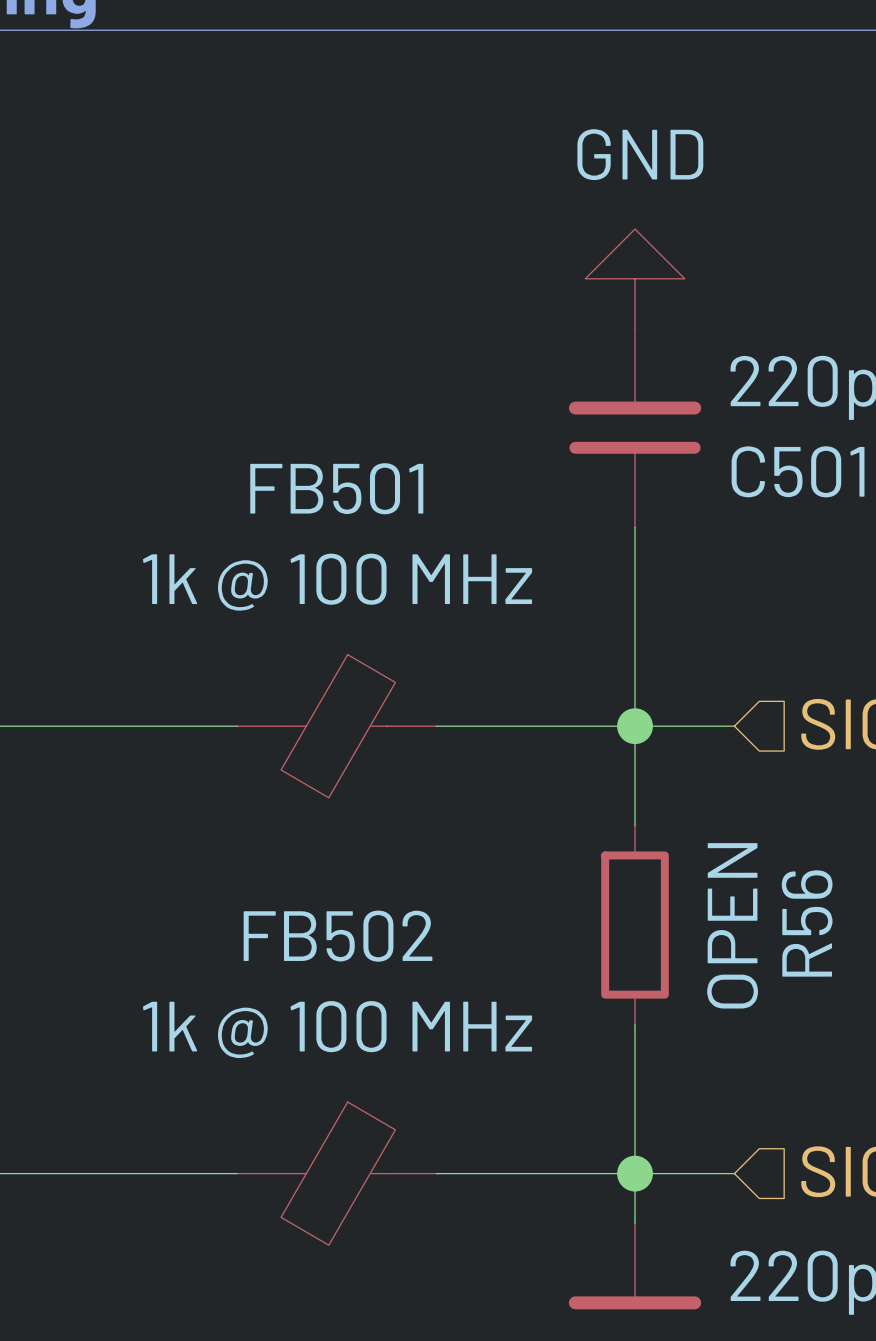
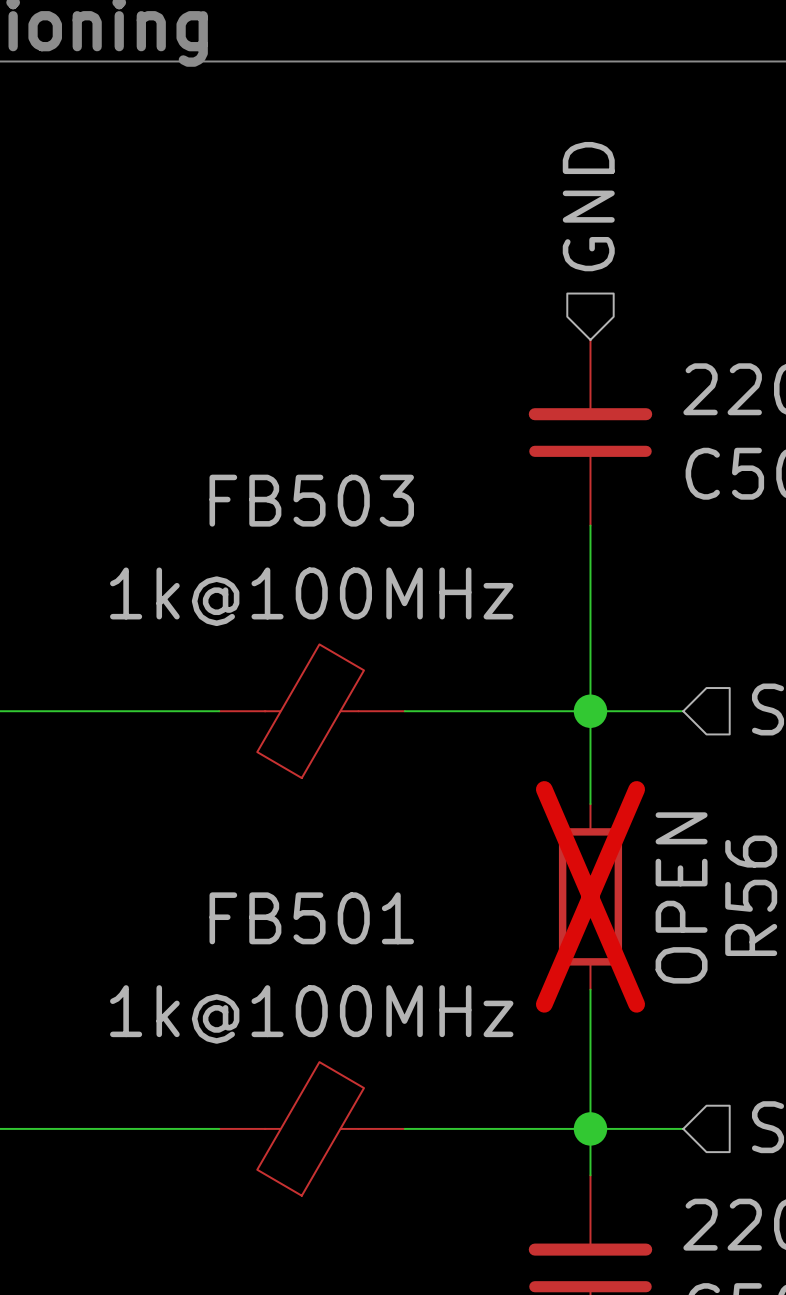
hierarchical label: none -> GND (588, 206)
power symbol: GND (635, 278) -> none
FB501 value: 1k @ 100 MHz (337, 582) -> 1k@100MHz (311, 1014)
FB501 position: (336, 726) -> (312, 1128)
FB503: none -> 1k@100MHz (312, 711)
FB501 rotation: 0° (338, 726) -> 180° (310, 1128)
R56 do-not-place cross: none -> (590, 896)
FB502: 1k @ 100 MHz (336, 1173) -> none

